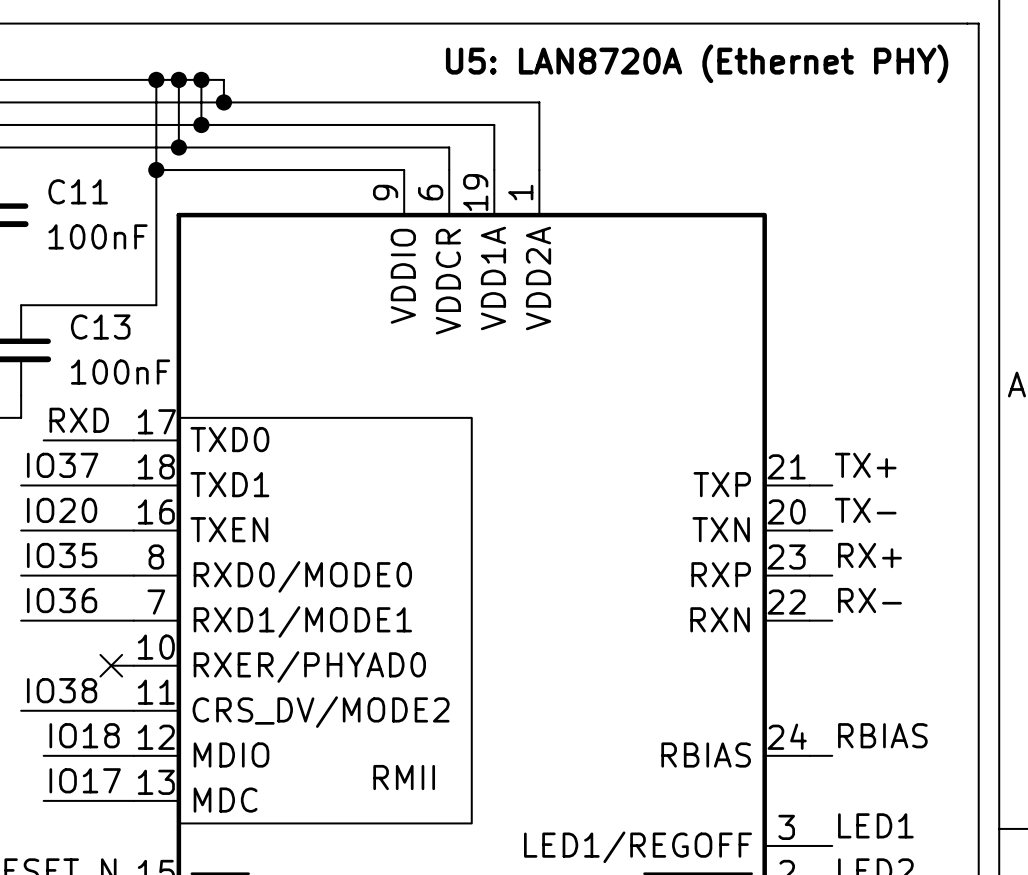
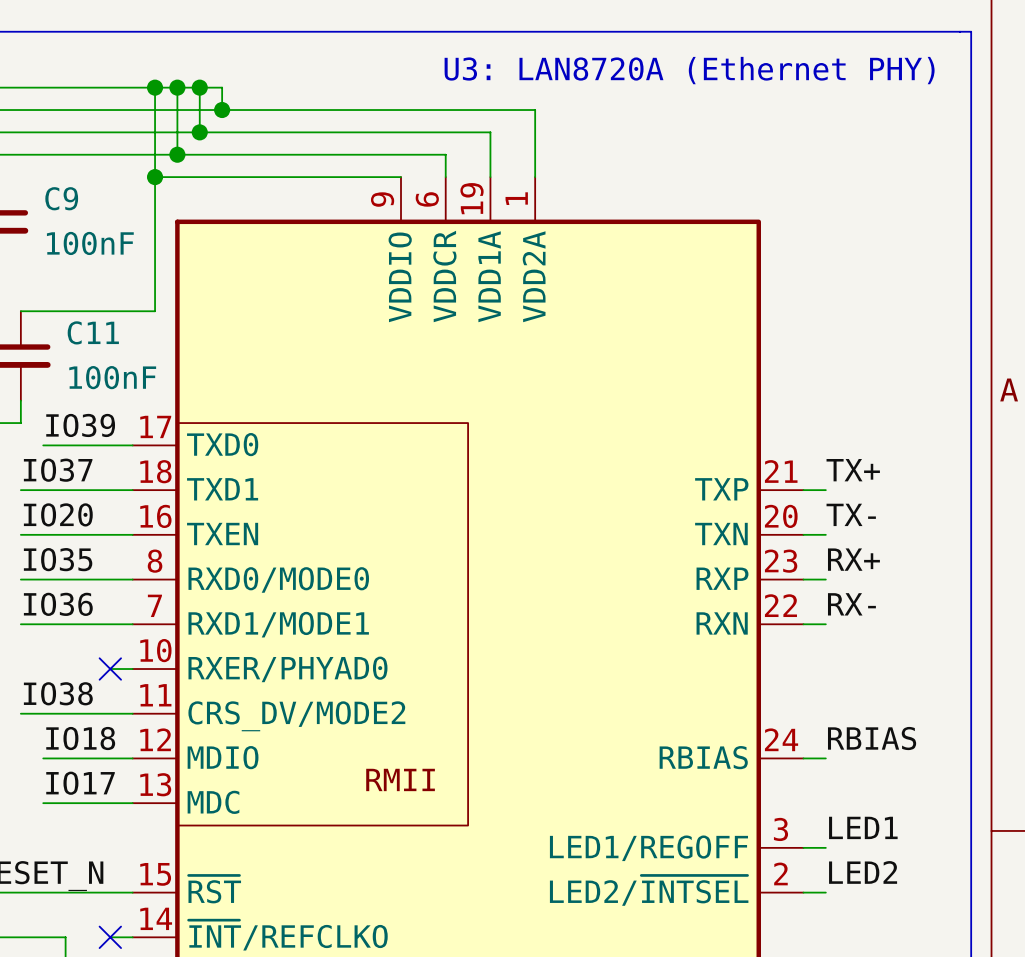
text: U5: LAN8720A (Ethernet PHY) (697, 63) -> U3: LAN8720A (Ethernet PHY) (689, 70)
C11 name: C11 (78, 191) -> C9 (61, 198)
C13 name: C13 (100, 327) -> C11 (93, 332)
label: RXD (79, 420) -> IO39 (80, 425)

